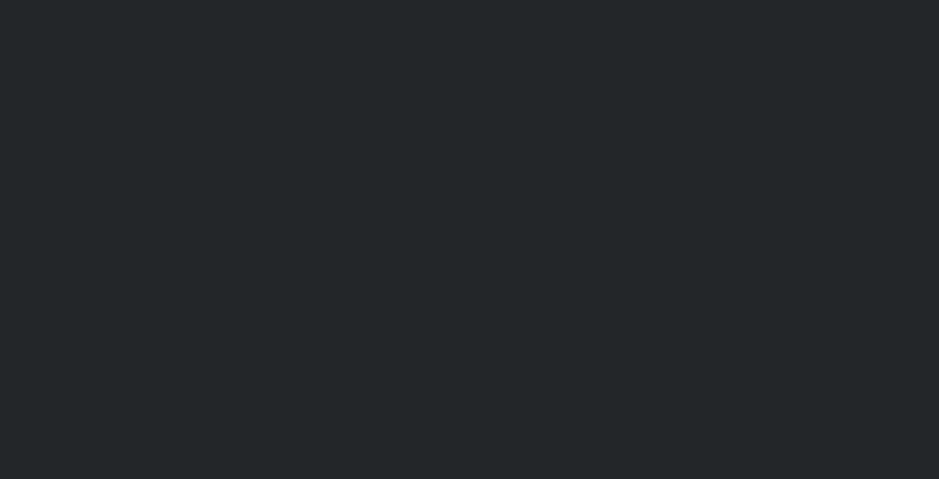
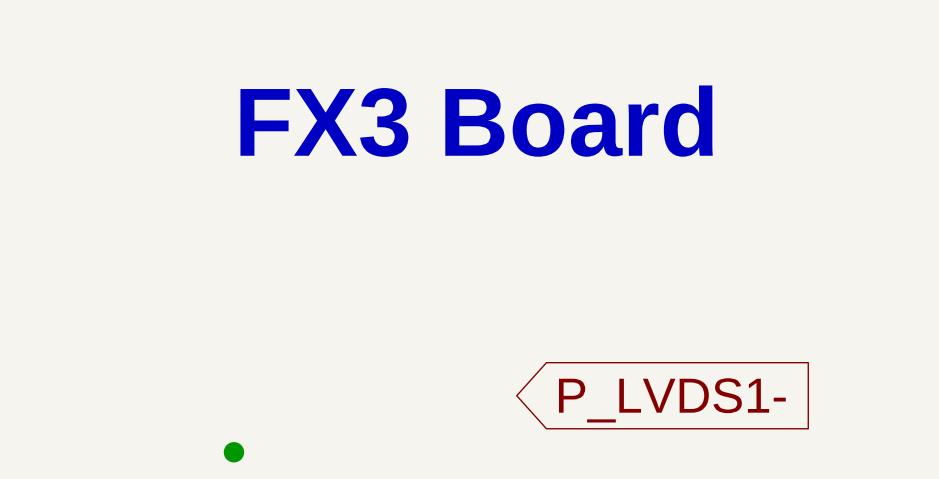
text: none -> FX3 Board (476, 121)
global label: none -> P_LVDS1- (672, 400)
junction: none -> (233, 452)

